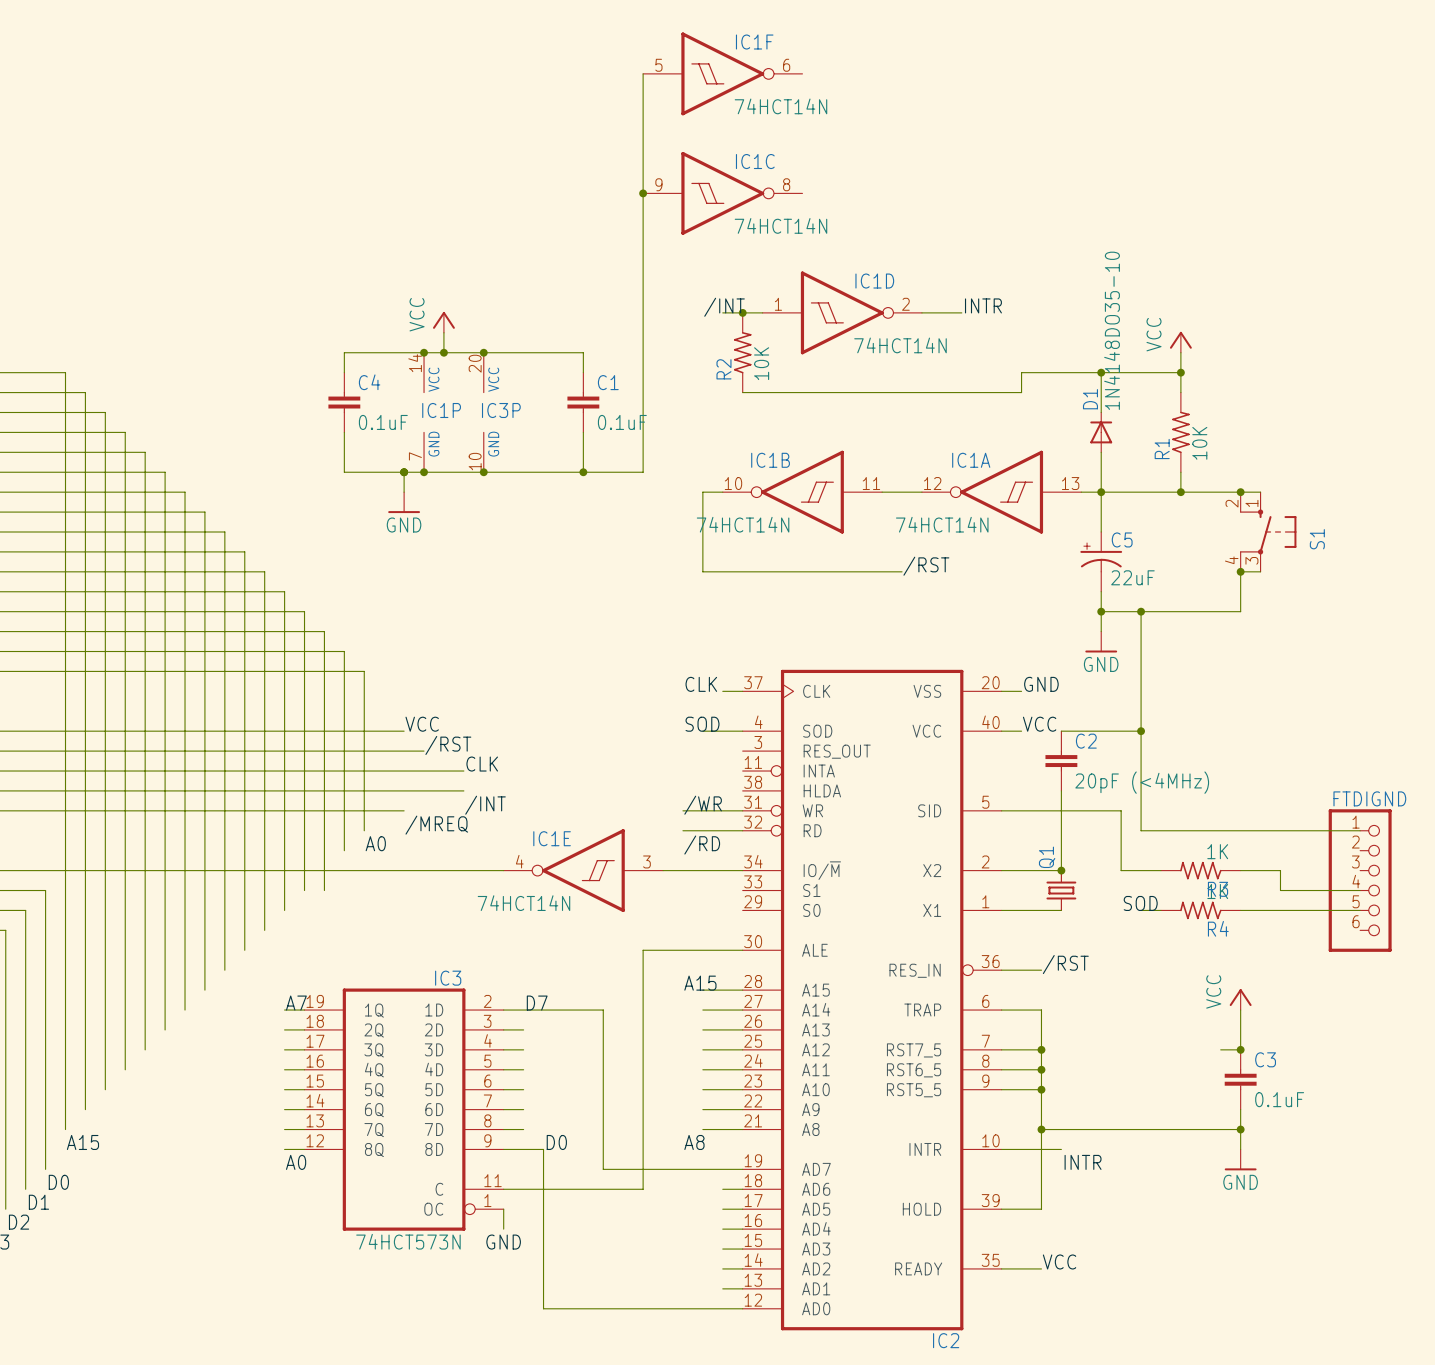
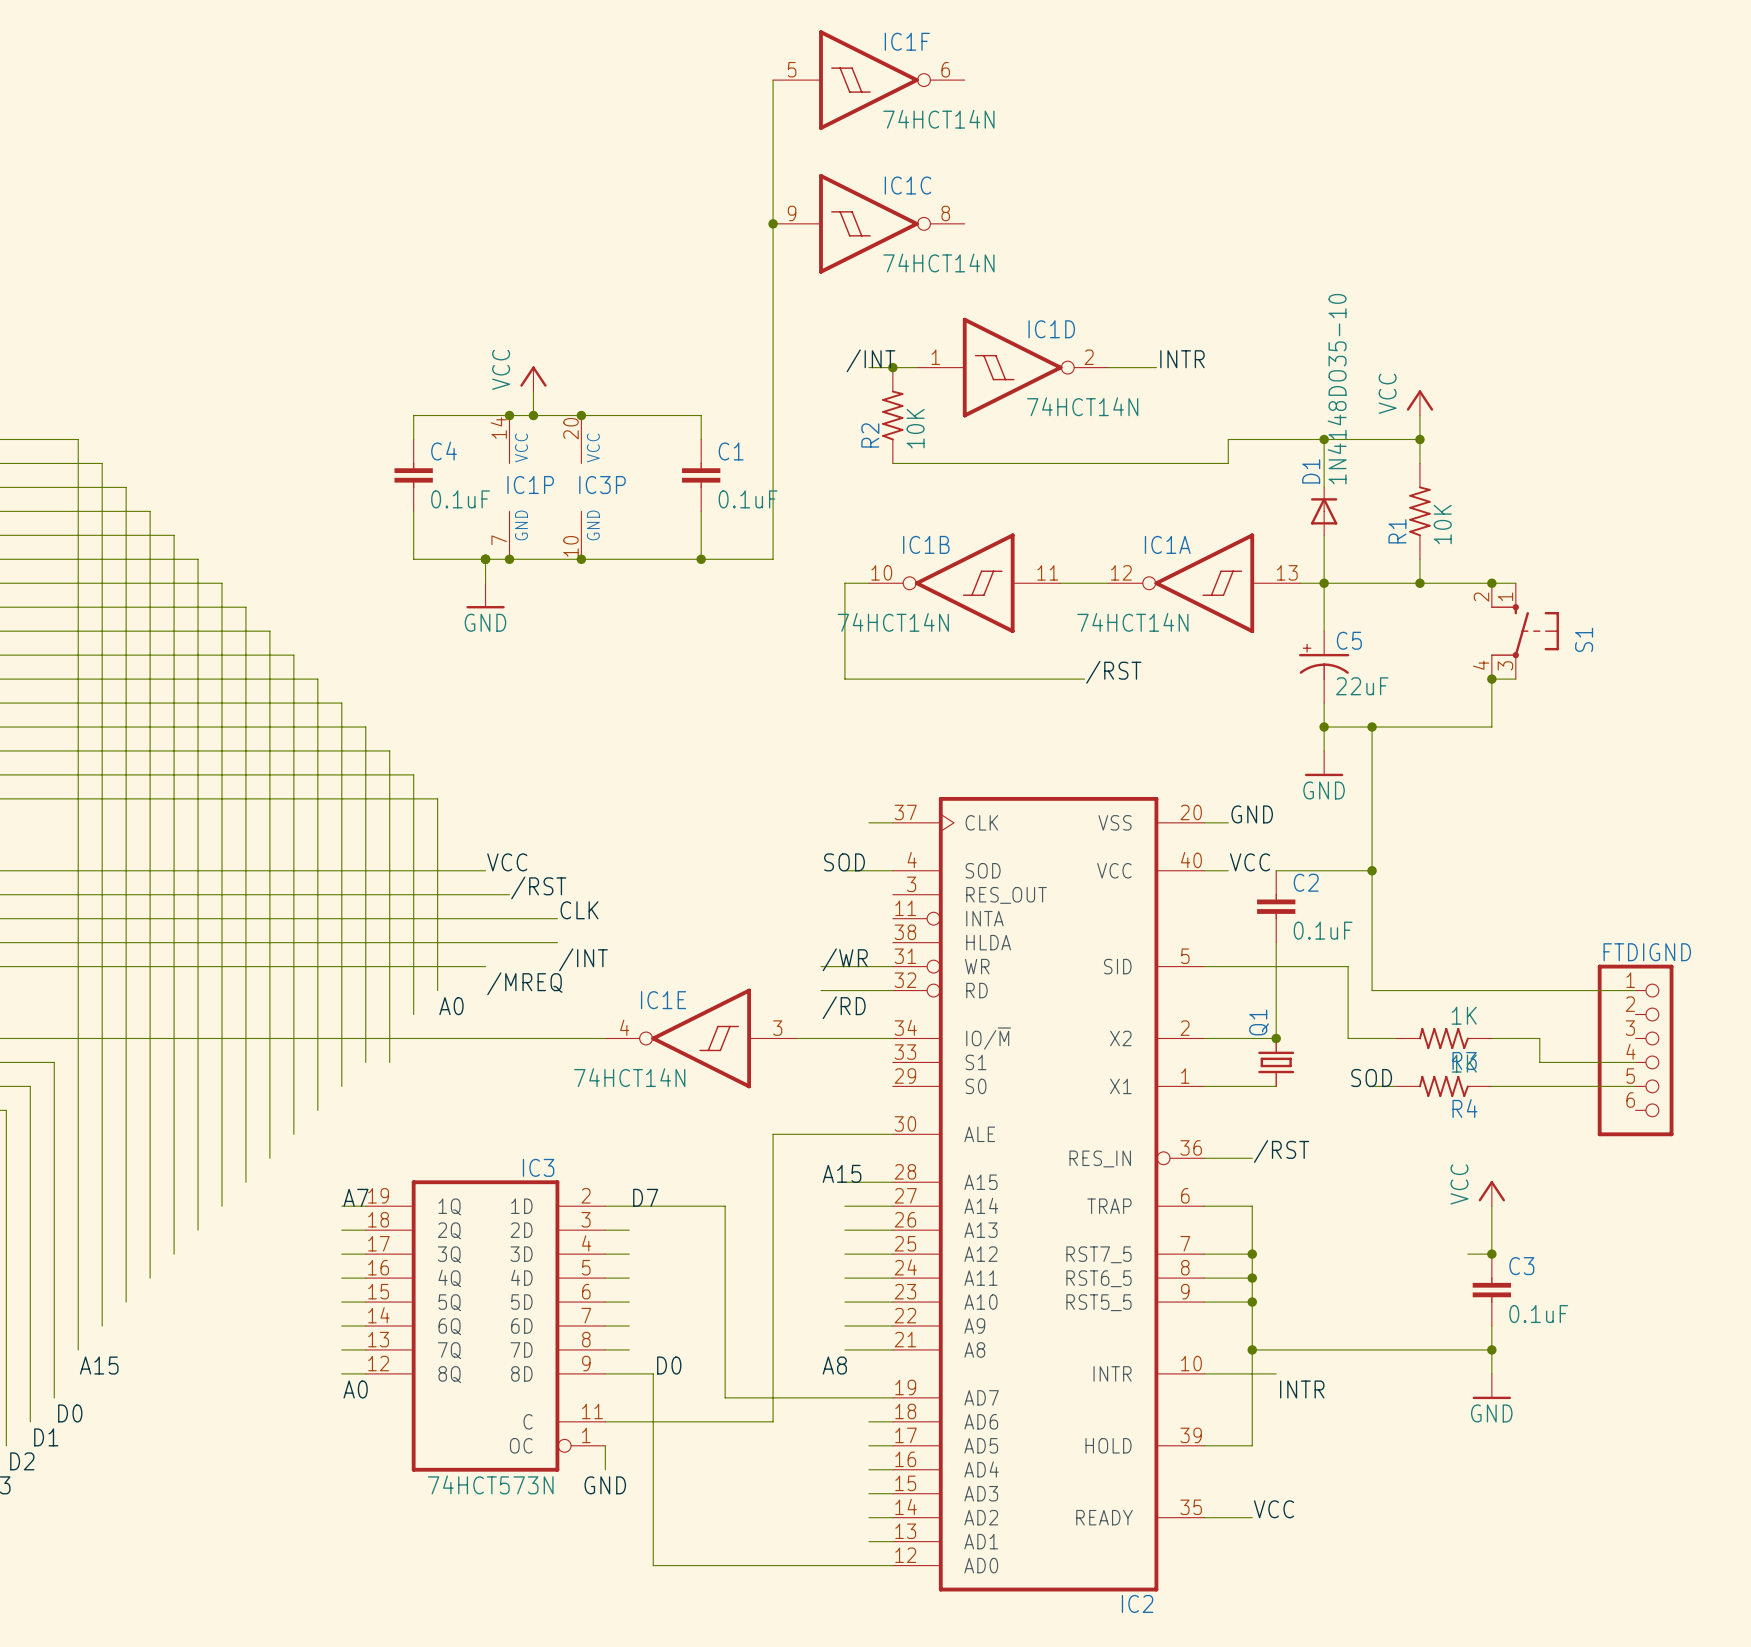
label: CLK (701, 684) -> none
C2 value: 20pF (<4MHz) (1142, 782) -> 0.1uF (1323, 930)

